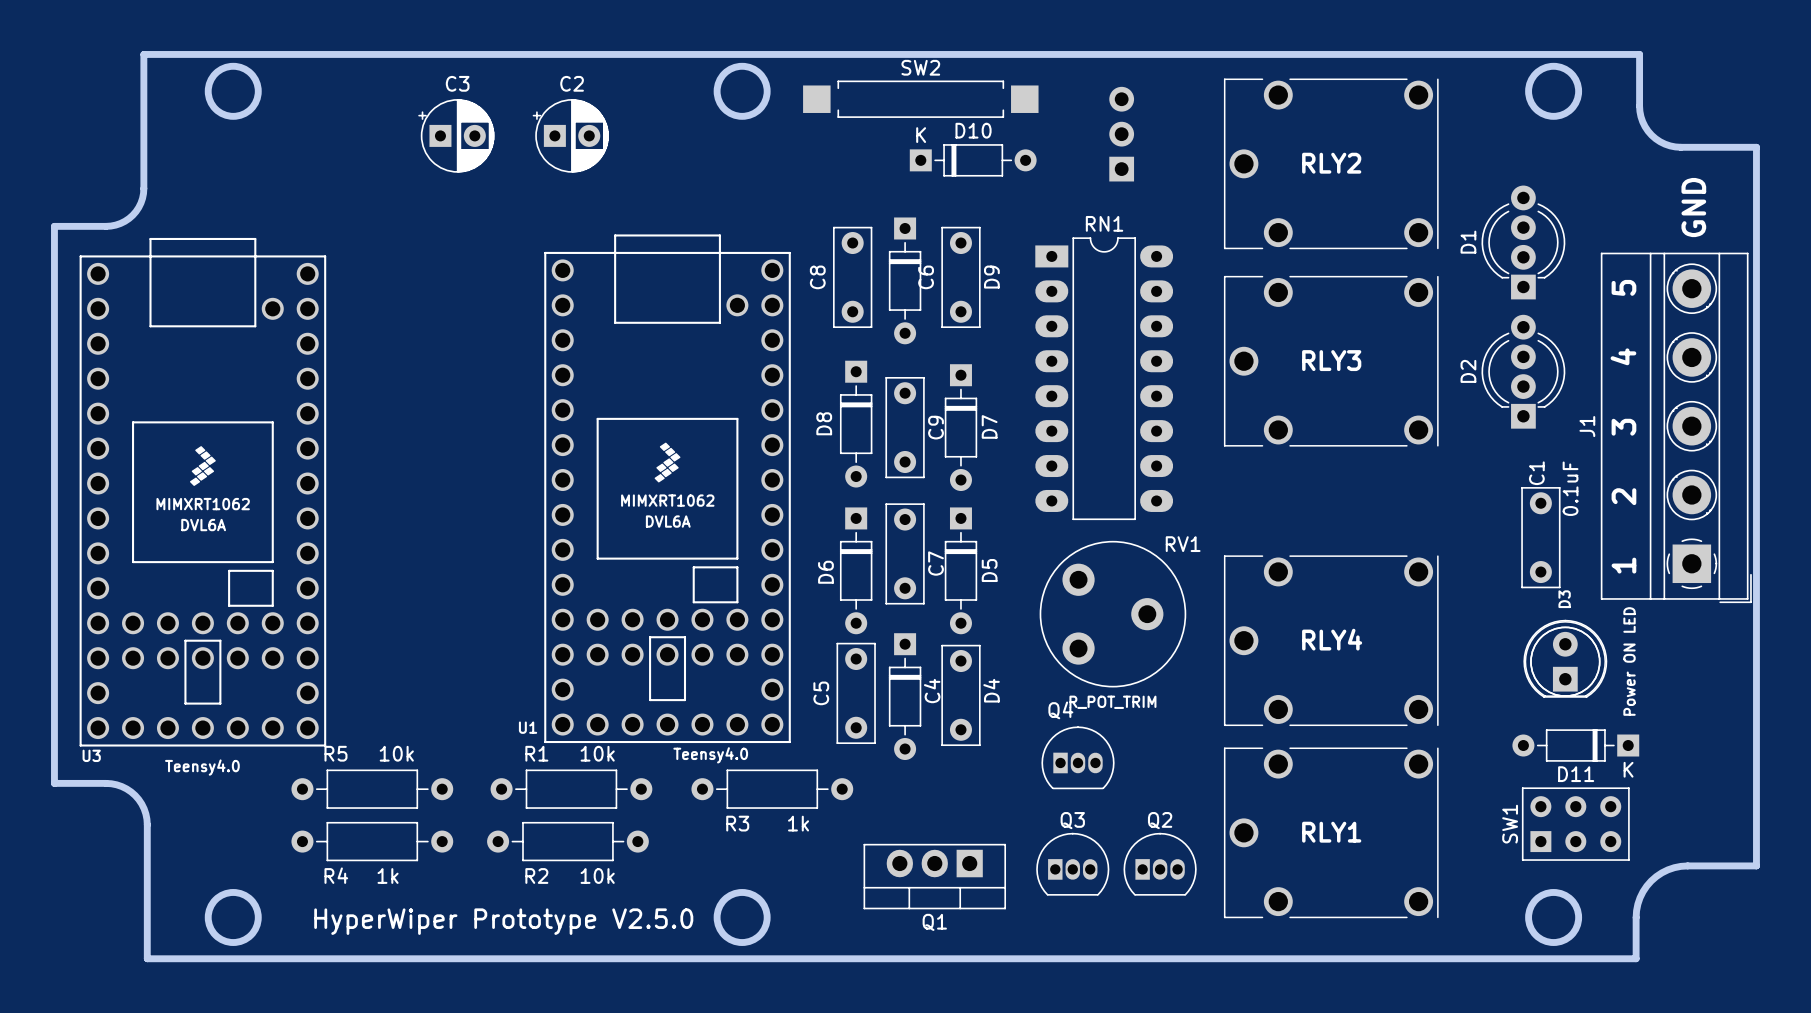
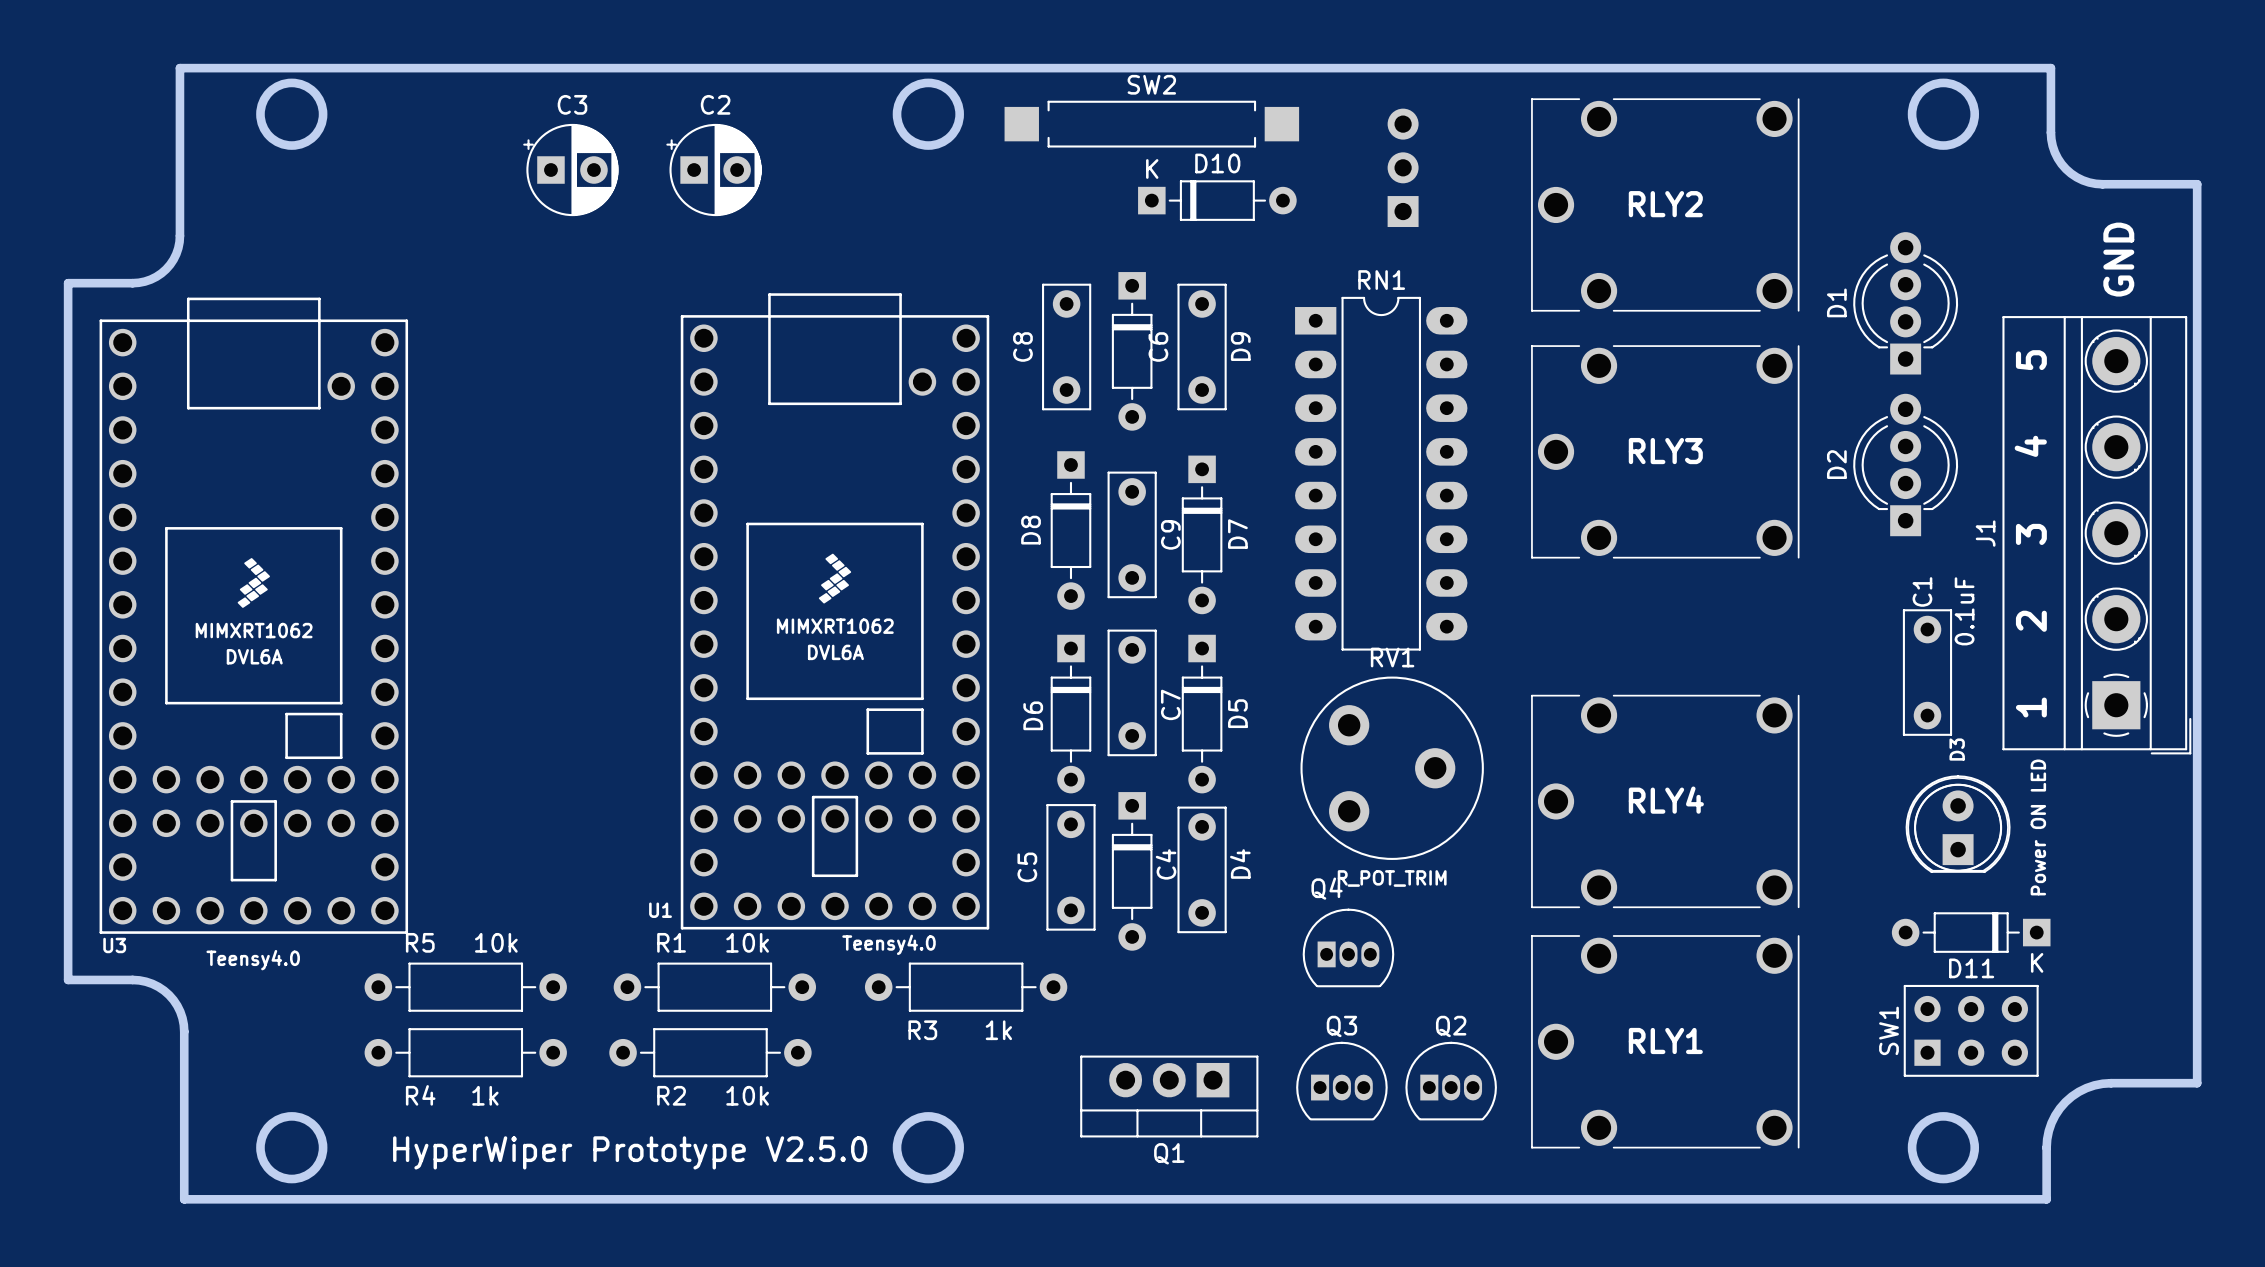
RV1 name position: RV1 (1183, 544) -> RV1 (1392, 657)

